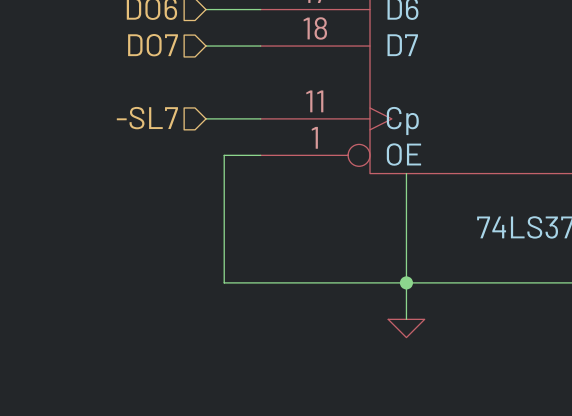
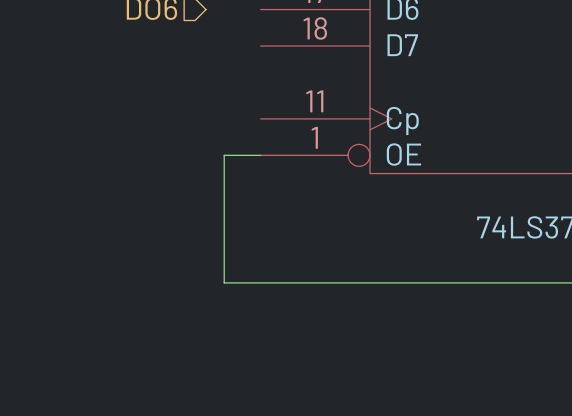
wire: (206, 9) (260, 9) -> none
hierarchical label: DO7 (153, 45) -> none
wire: (206, 46) (260, 46) -> none
hierarchical label: -SL7 (147, 118) -> none
wire: (206, 118) (260, 118) -> none
wire: (406, 173) (406, 319) -> none
junction: (406, 282) -> none
power symbol: (406, 328) -> none

